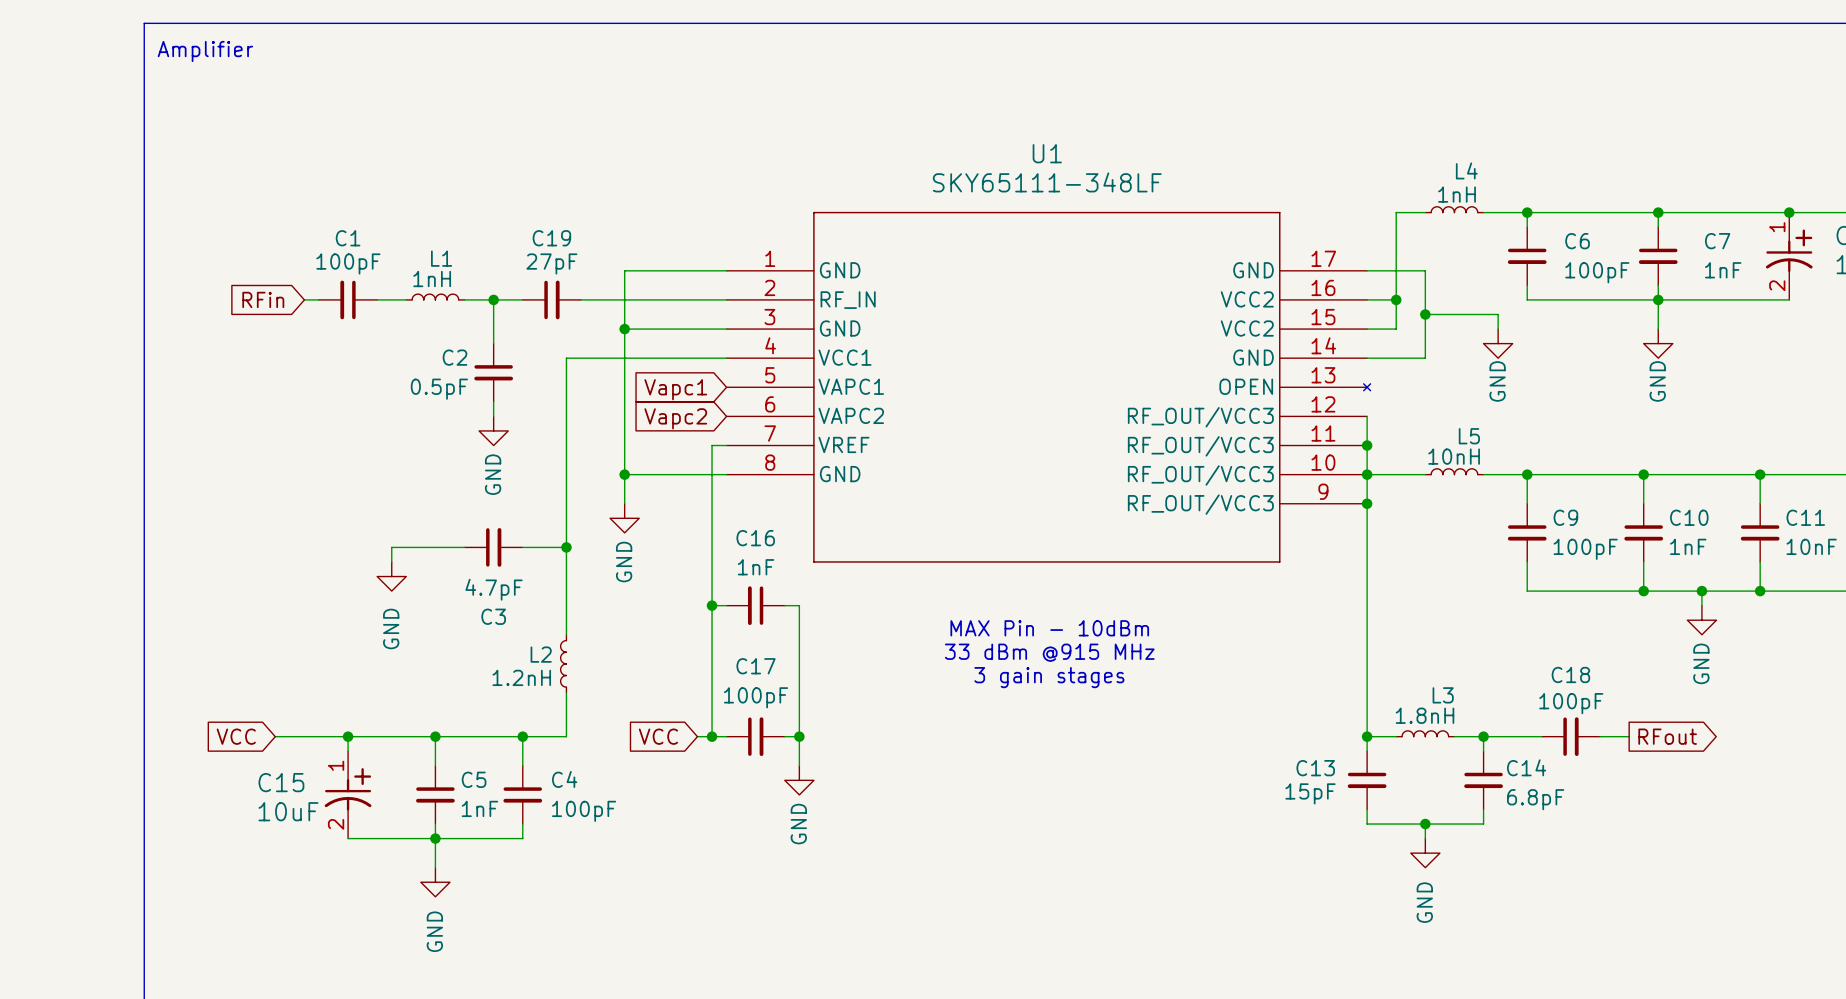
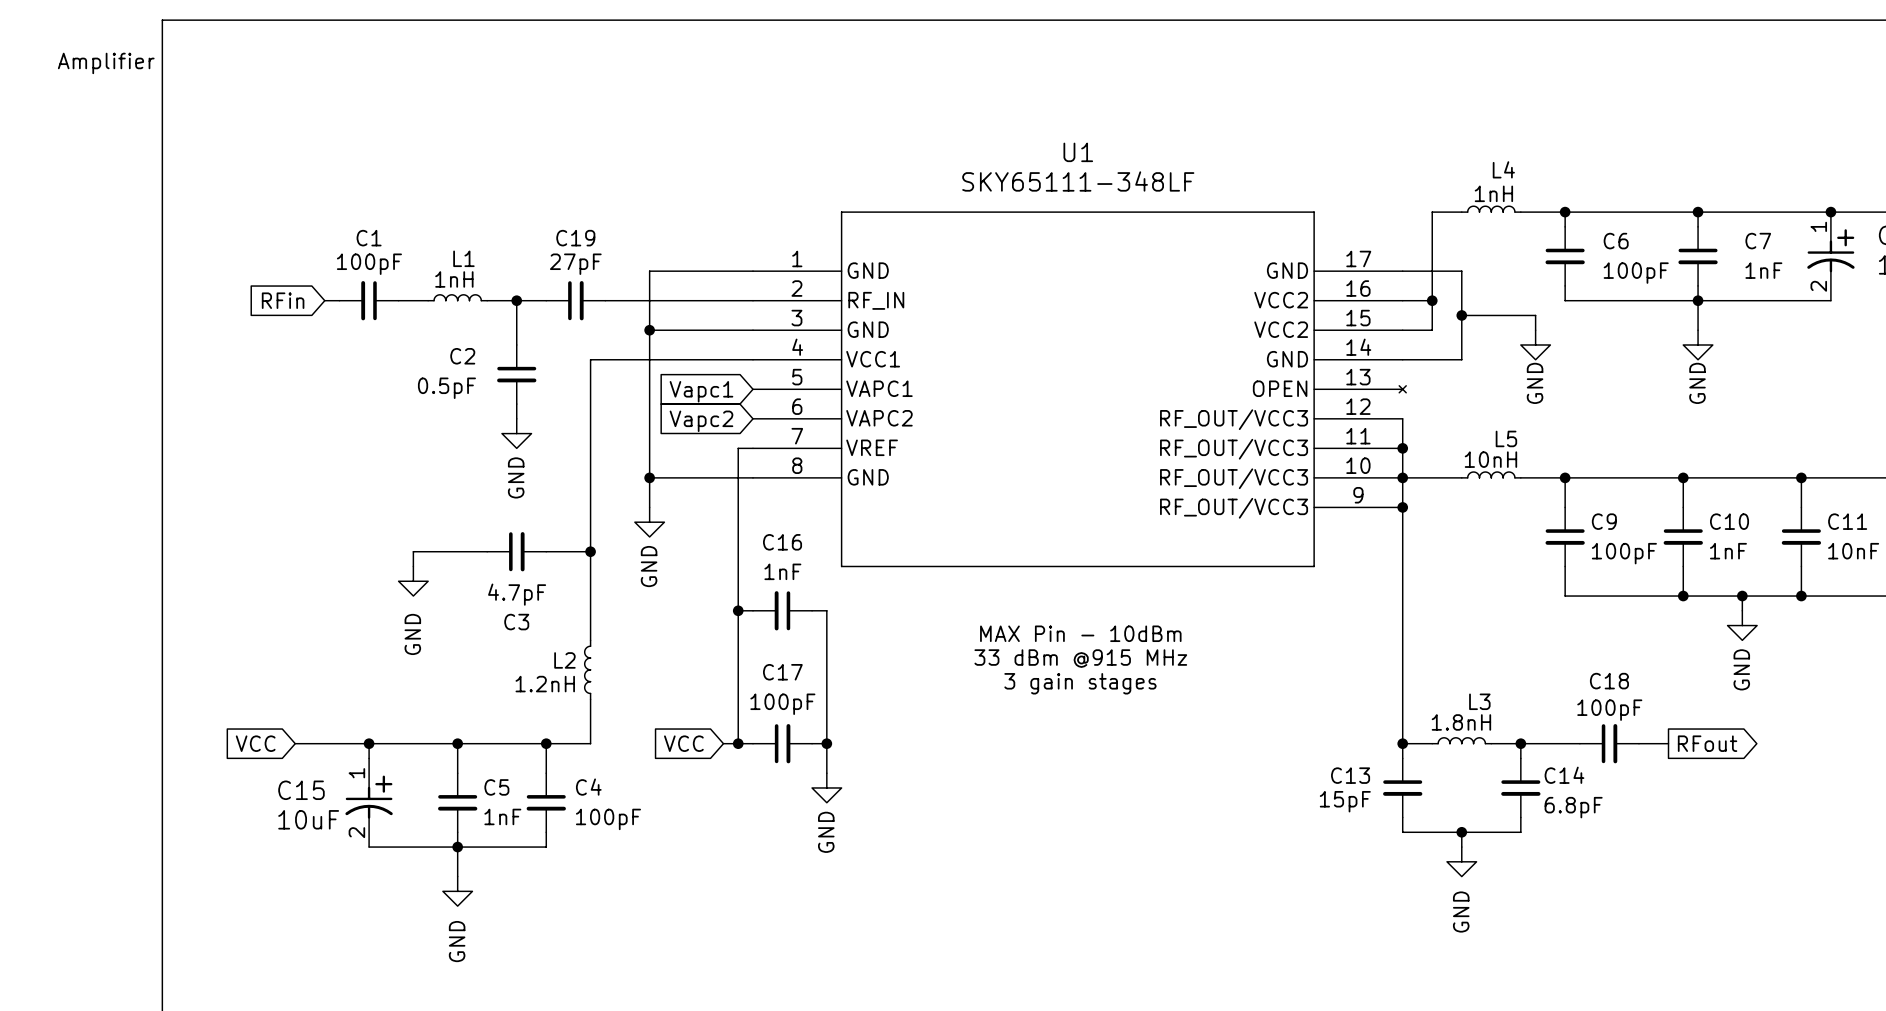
text position: Amplifier (205, 51) -> Amplifier (106, 63)
C2 name position: C2 (454, 357) -> C2 (462, 356)
C2 value position: 0.5pF (439, 389) -> 0.5pF (446, 388)

